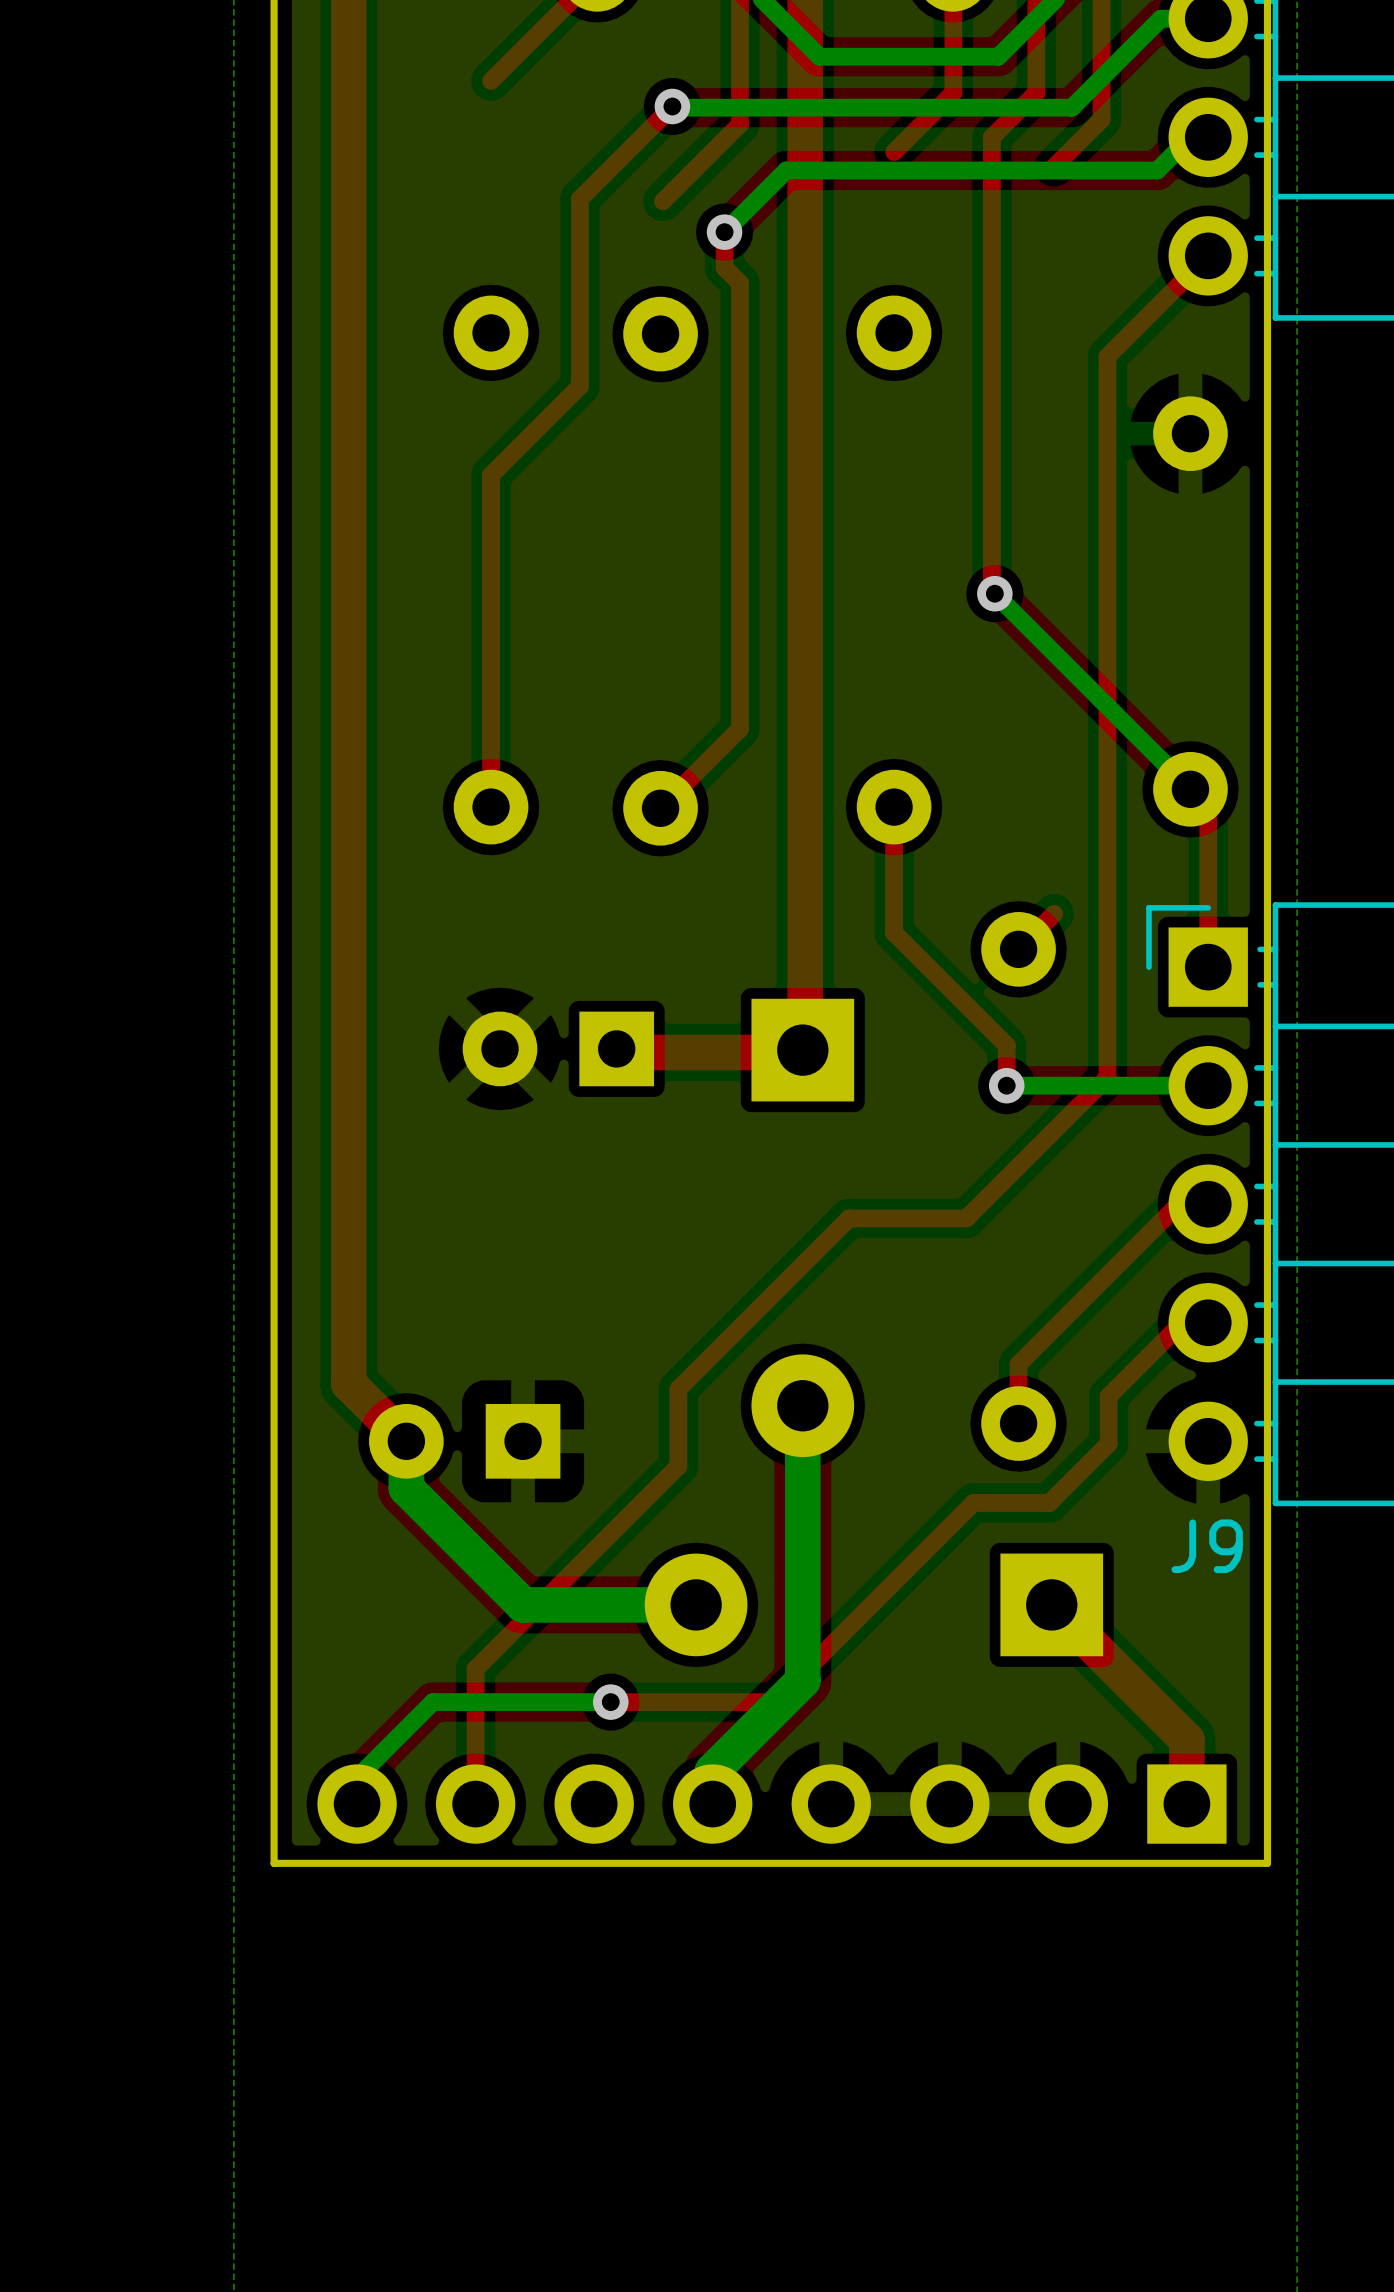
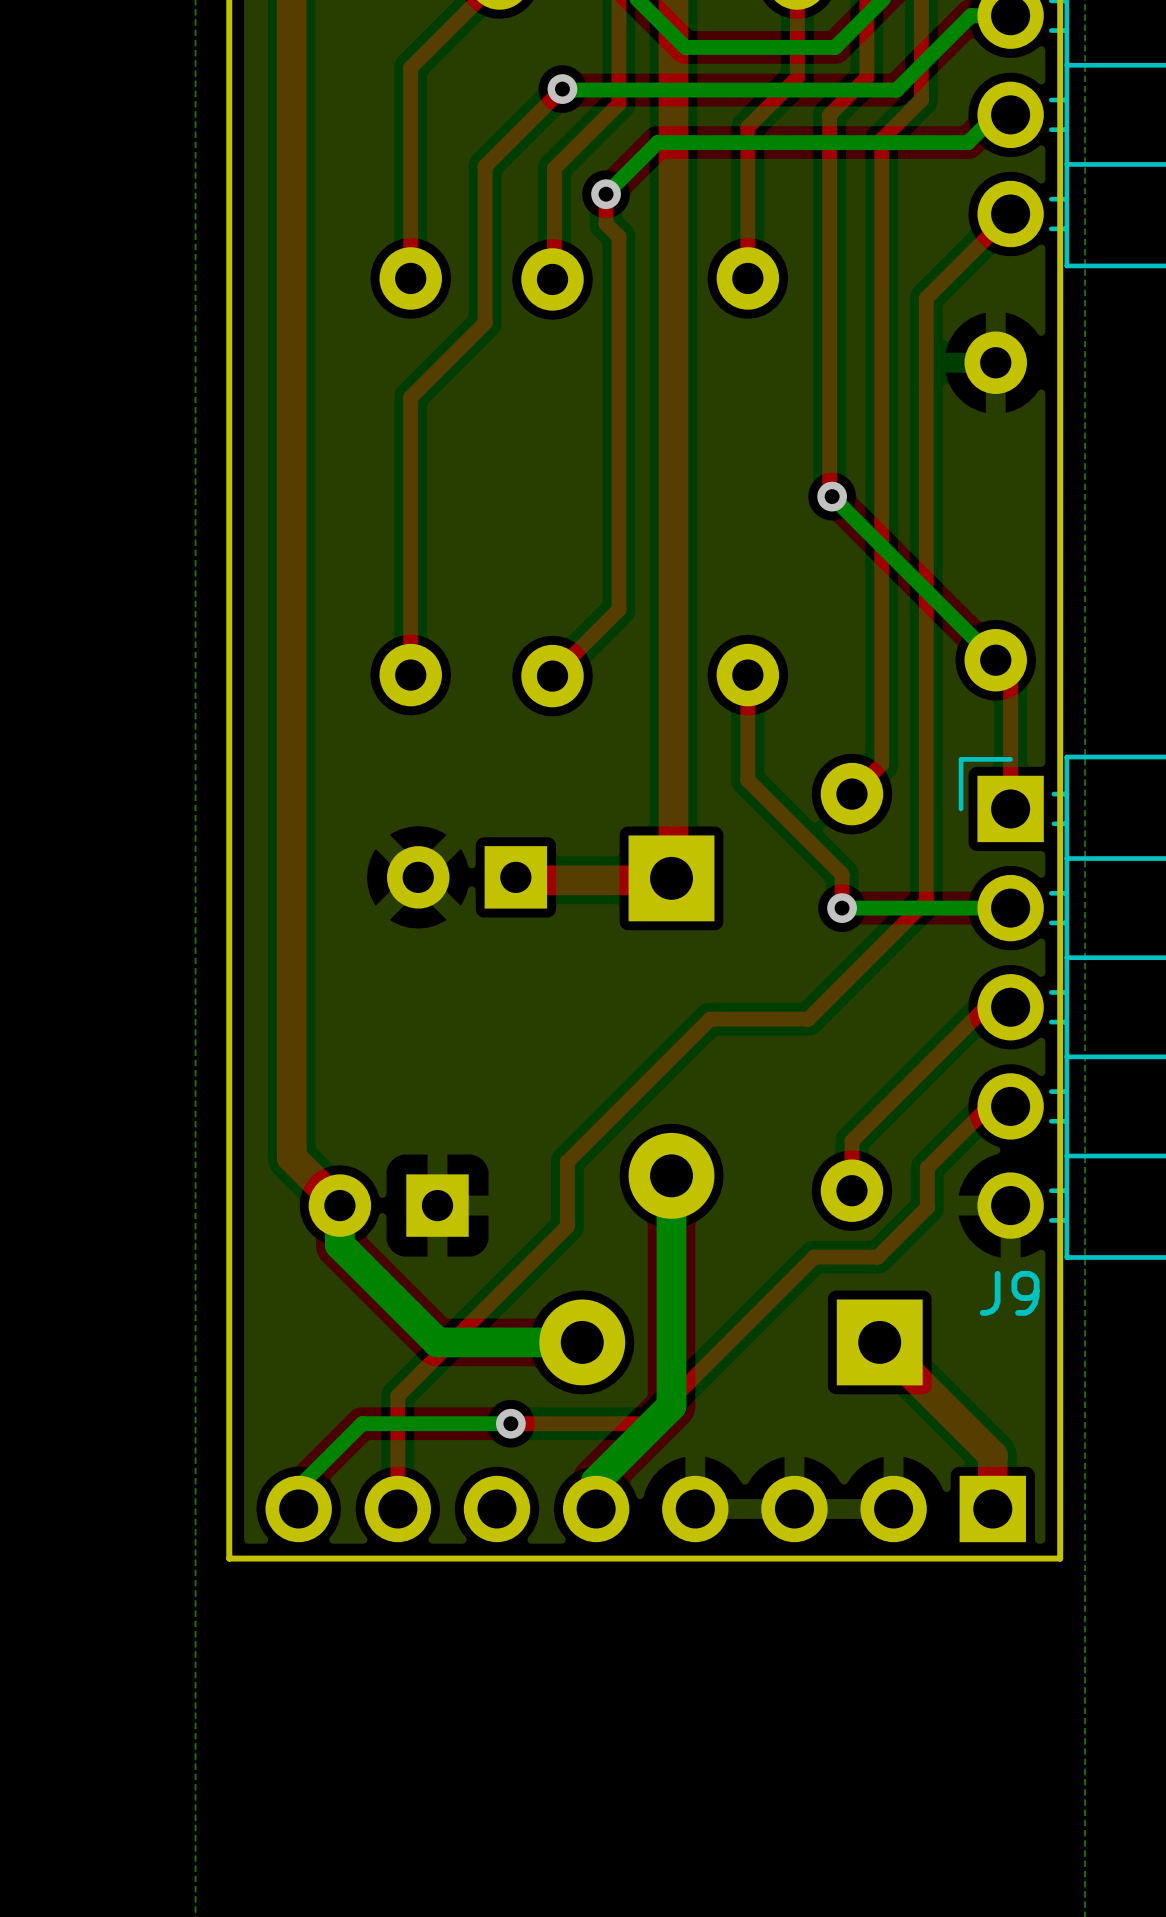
top track: none -> (410, 67) (410, 278)
top track: none -> (747, 127) (747, 278)
top track: none -> (881, 139) (881, 764)
top track: none -> (554, 168) (554, 277)

